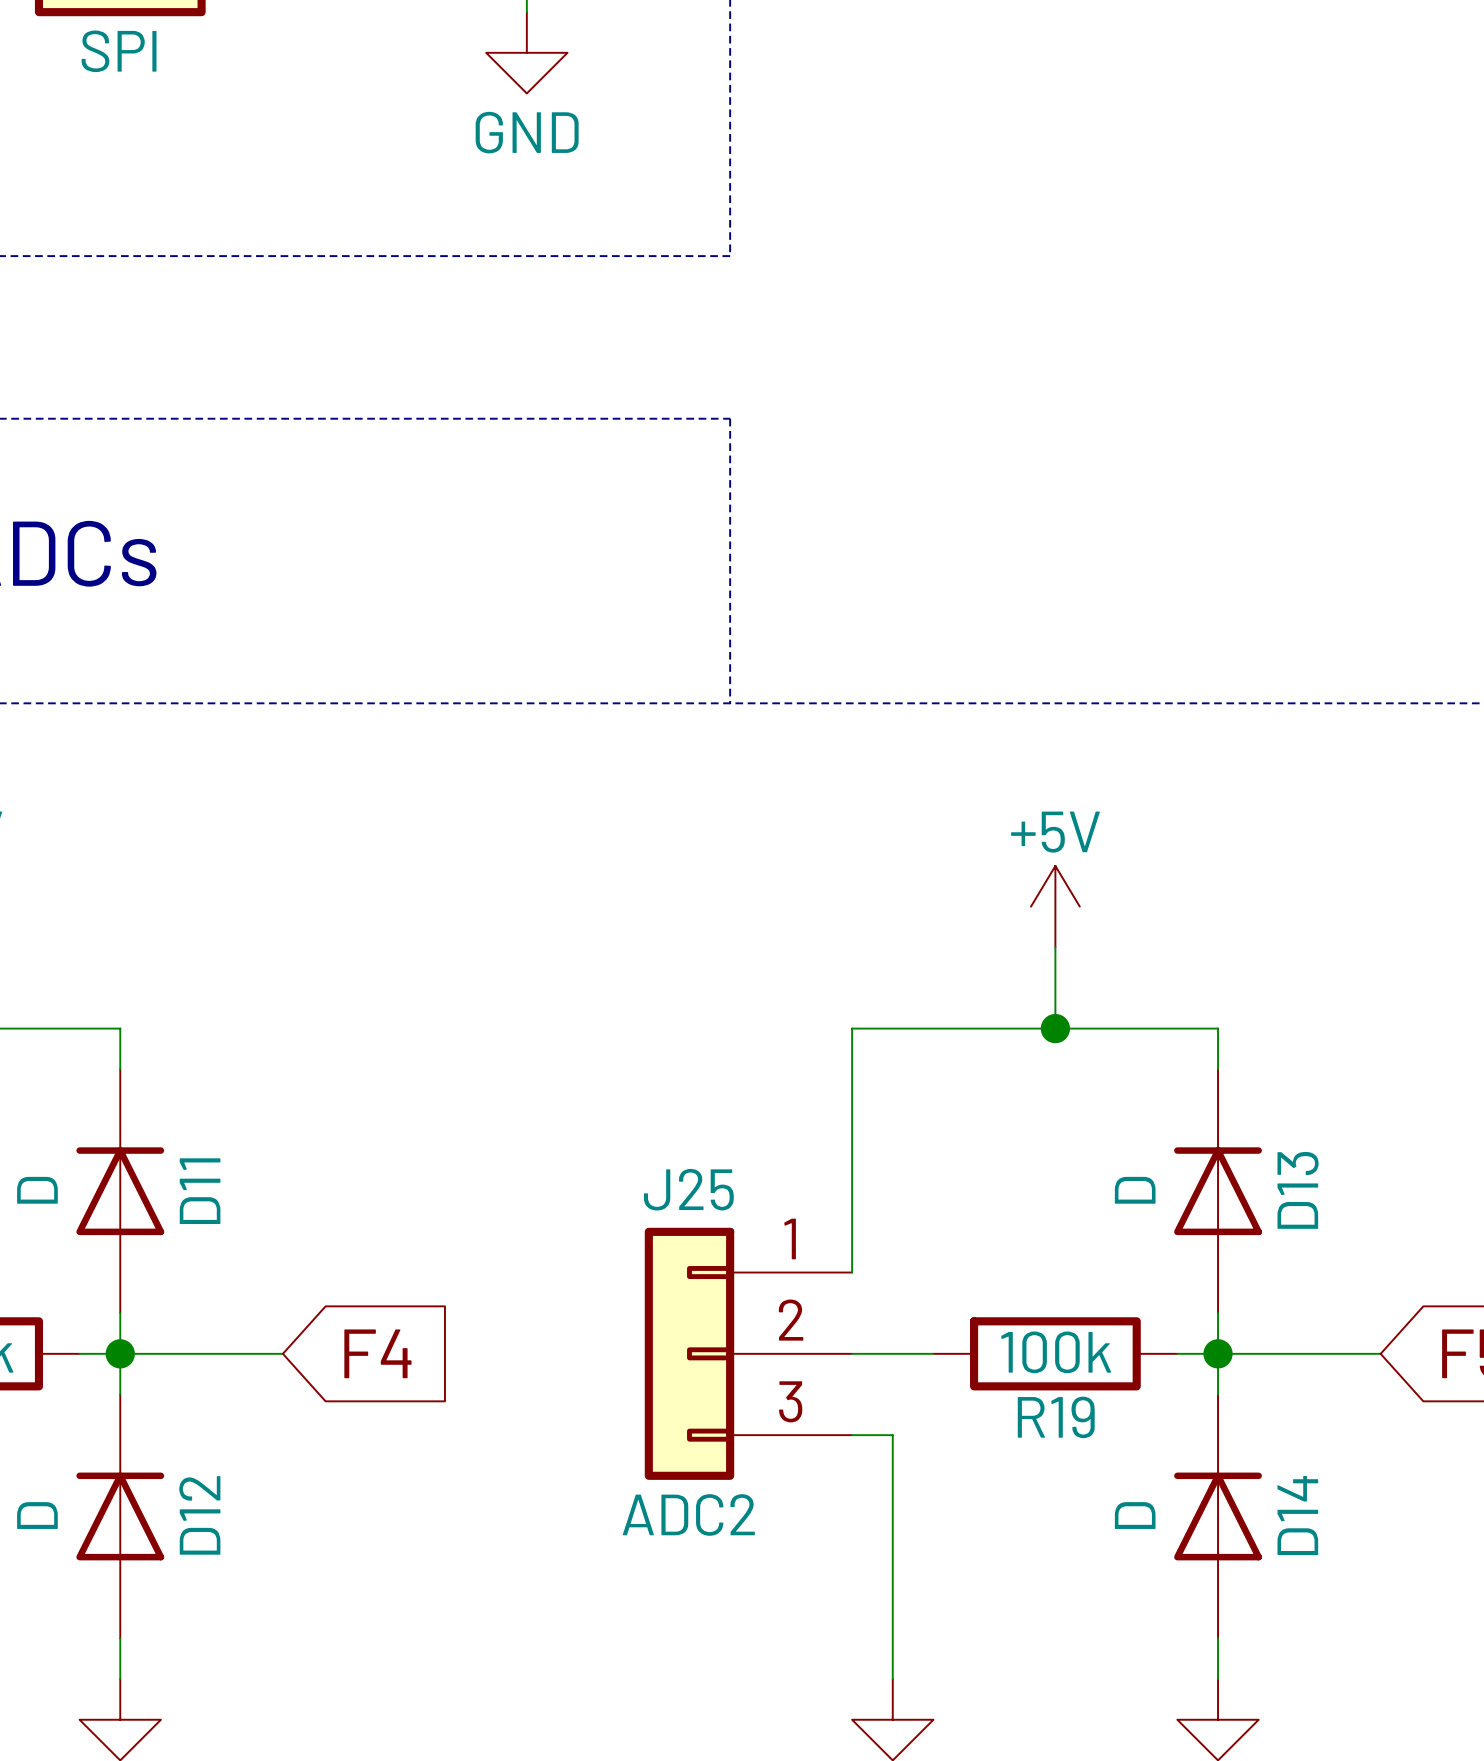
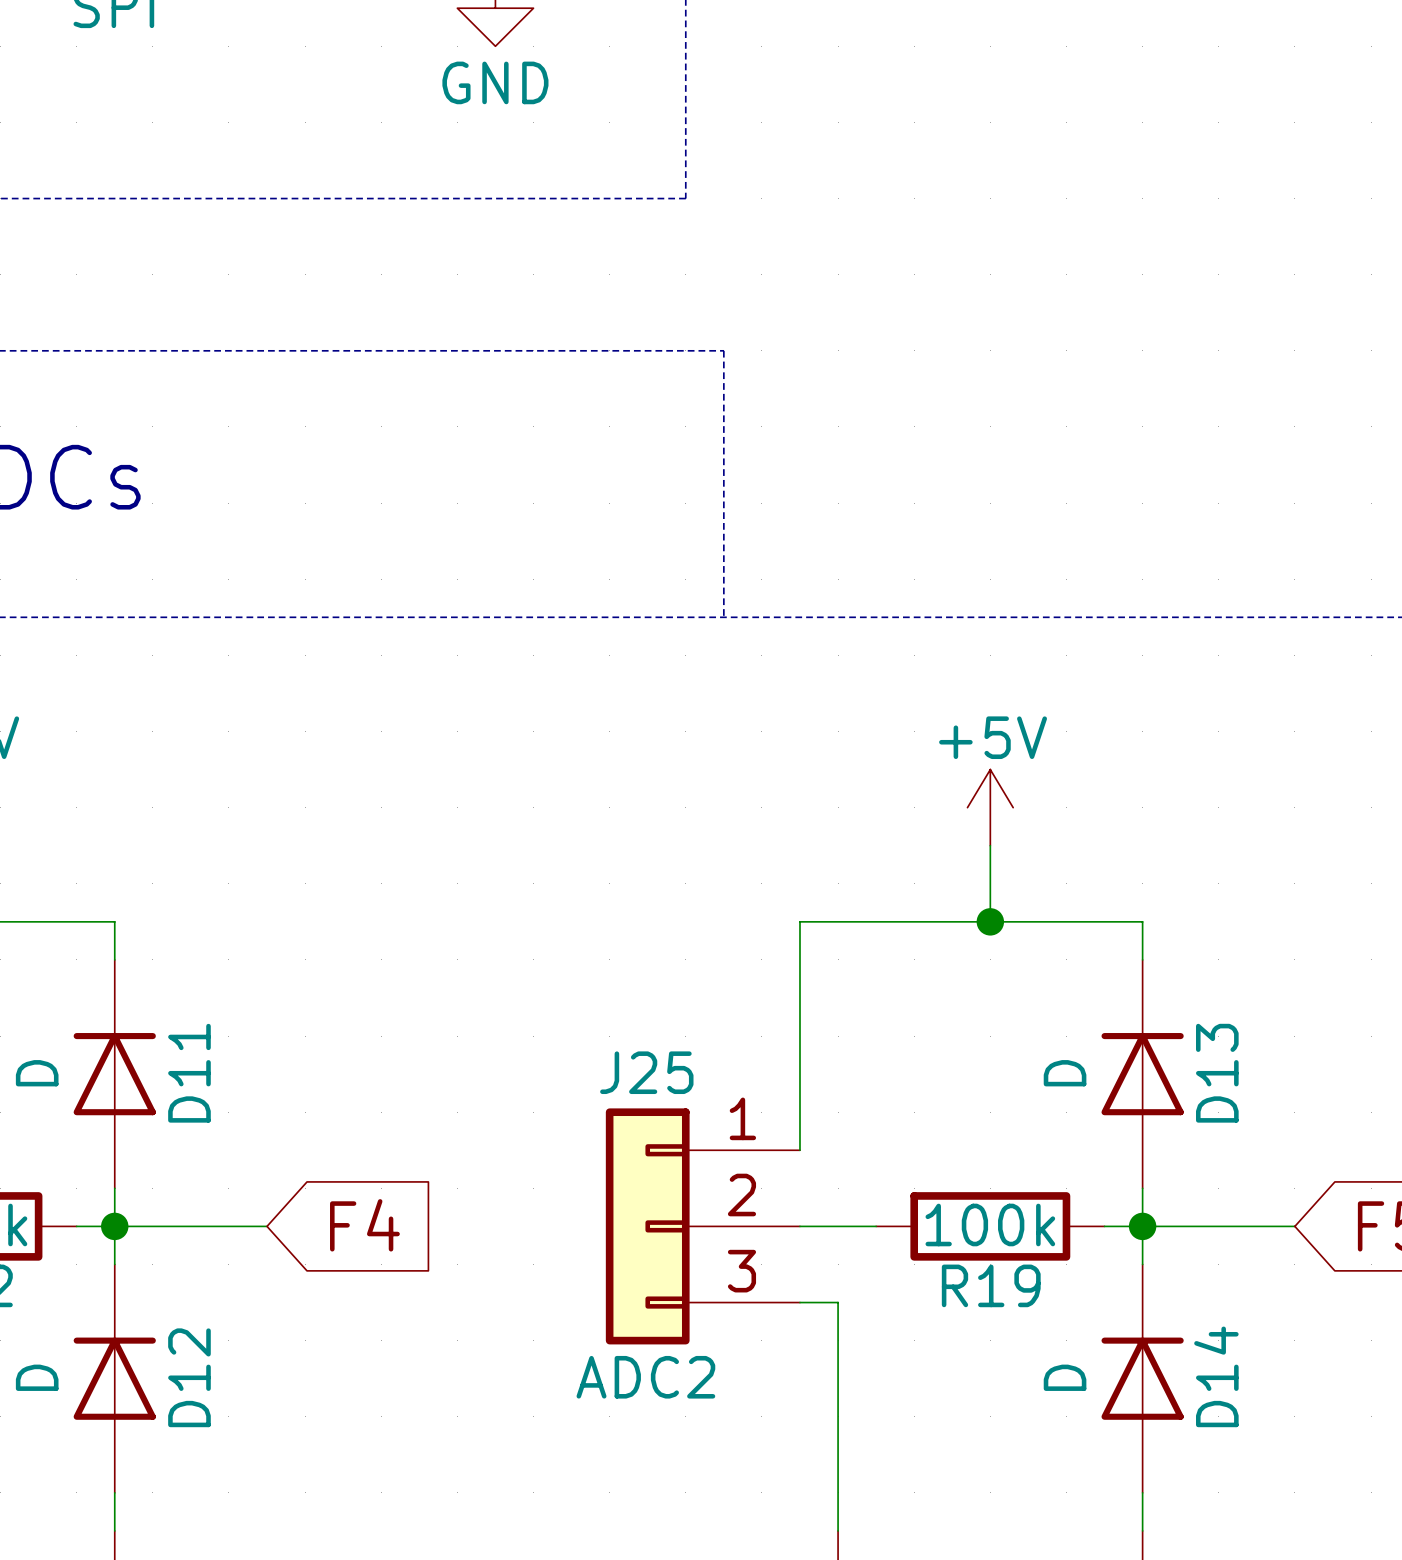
line: (730, 418) (730, 703) -> (685, 350) (723, 350) (723, 617)

